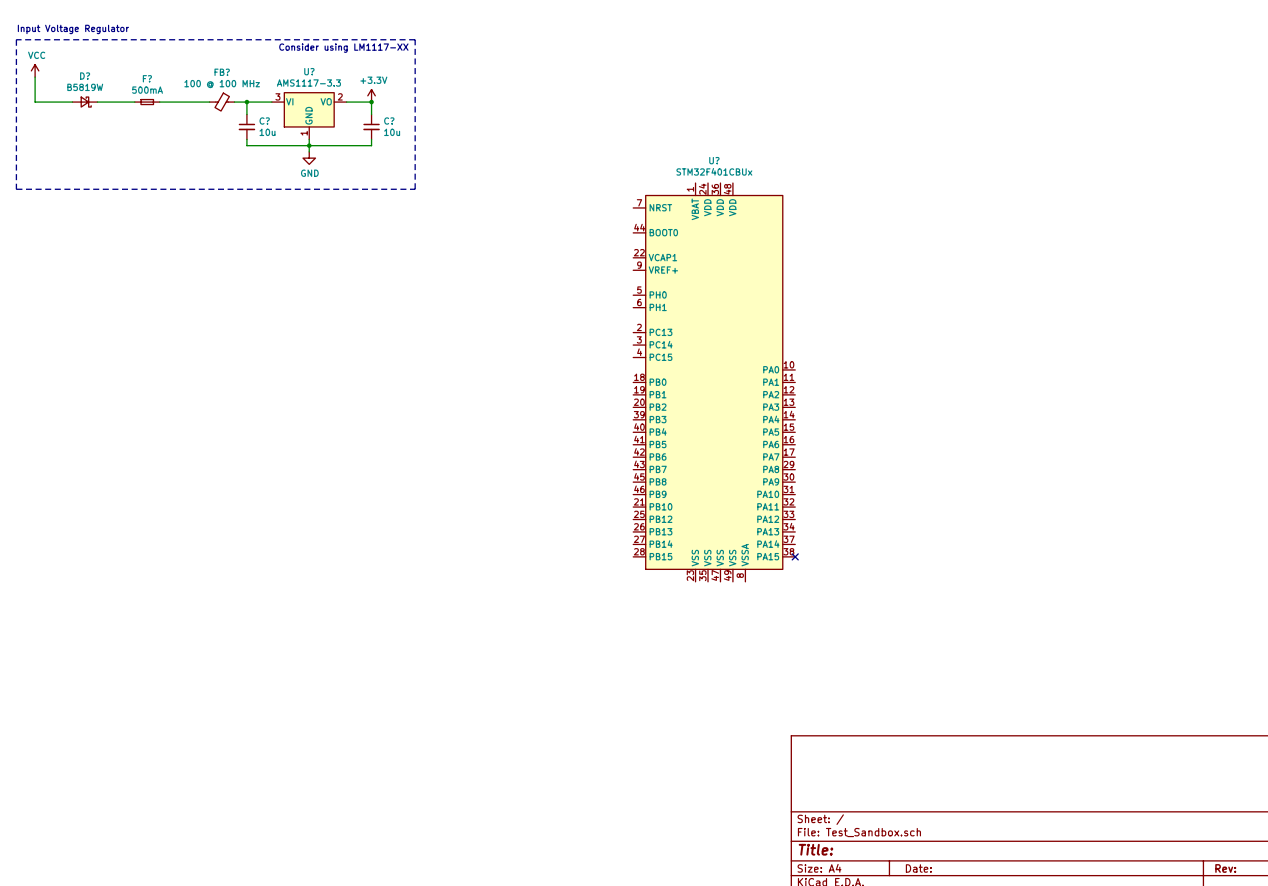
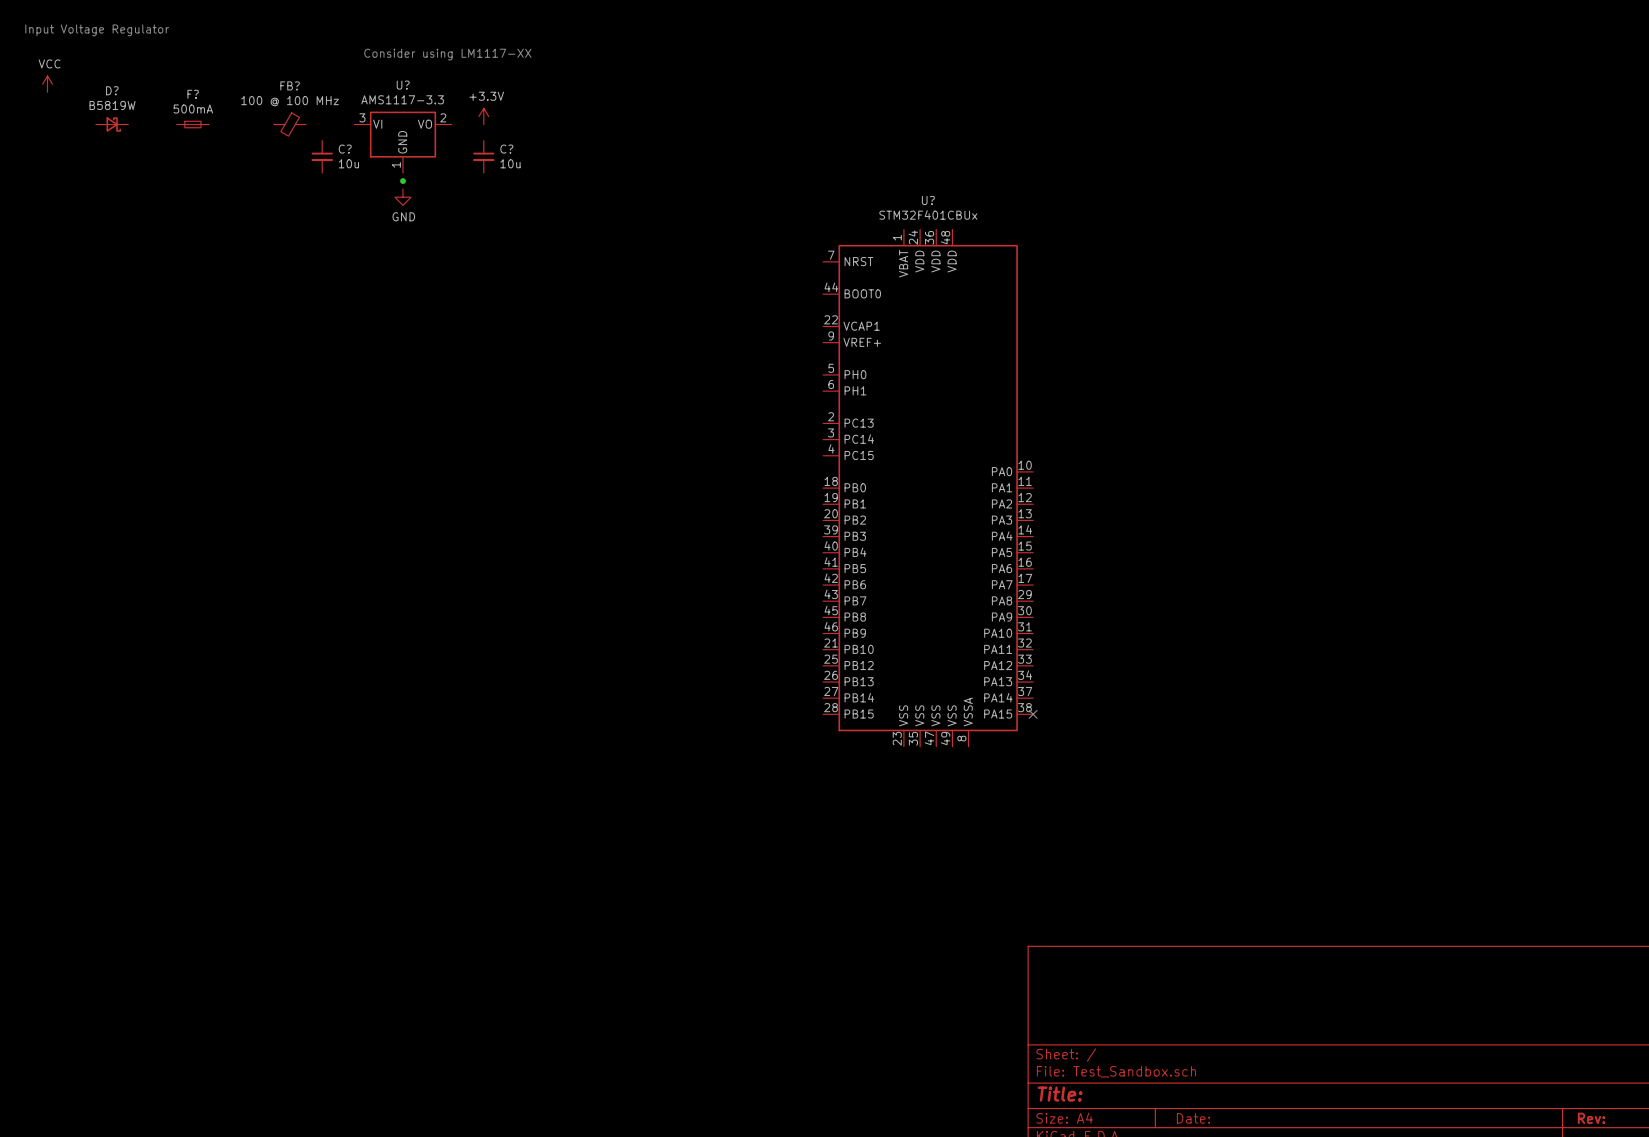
line: (16, 39) (415, 39) (415, 189) (16, 189) (16, 39) -> none
wire: (35, 77) (35, 102) (72, 102) -> none
wire: (97, 102) (134, 102) -> none
wire: (159, 102) (209, 102) -> none
wire: (234, 102) (271, 102) -> none
wire: (246, 102) (246, 114) -> none
junction: (246, 102) -> none
wire: (346, 102) (371, 102) (371, 114) -> none
junction: (371, 102) -> none
wire: (246, 139) (246, 145) (371, 145) (371, 139) -> none
wire: (309, 139) (309, 151) -> none

